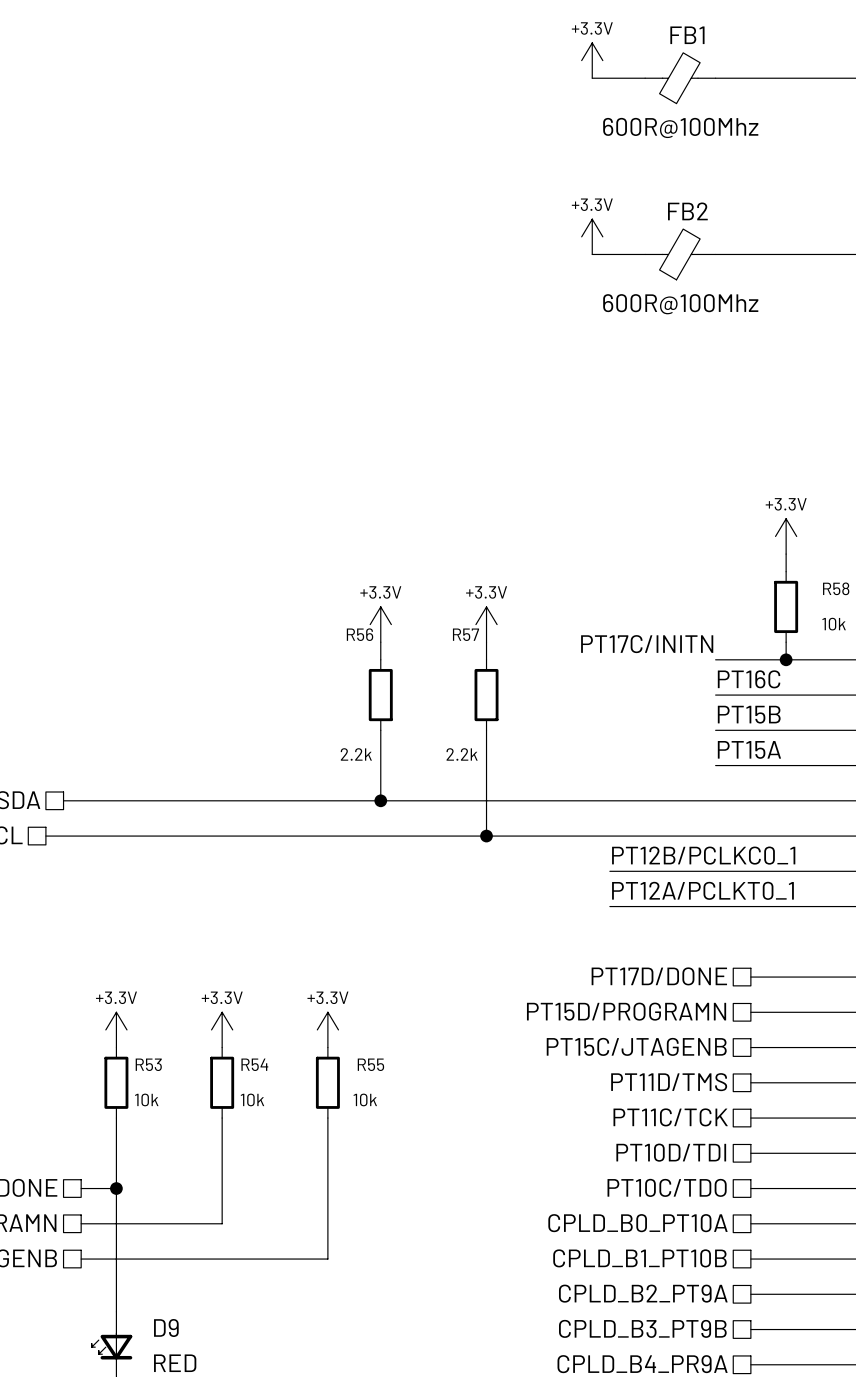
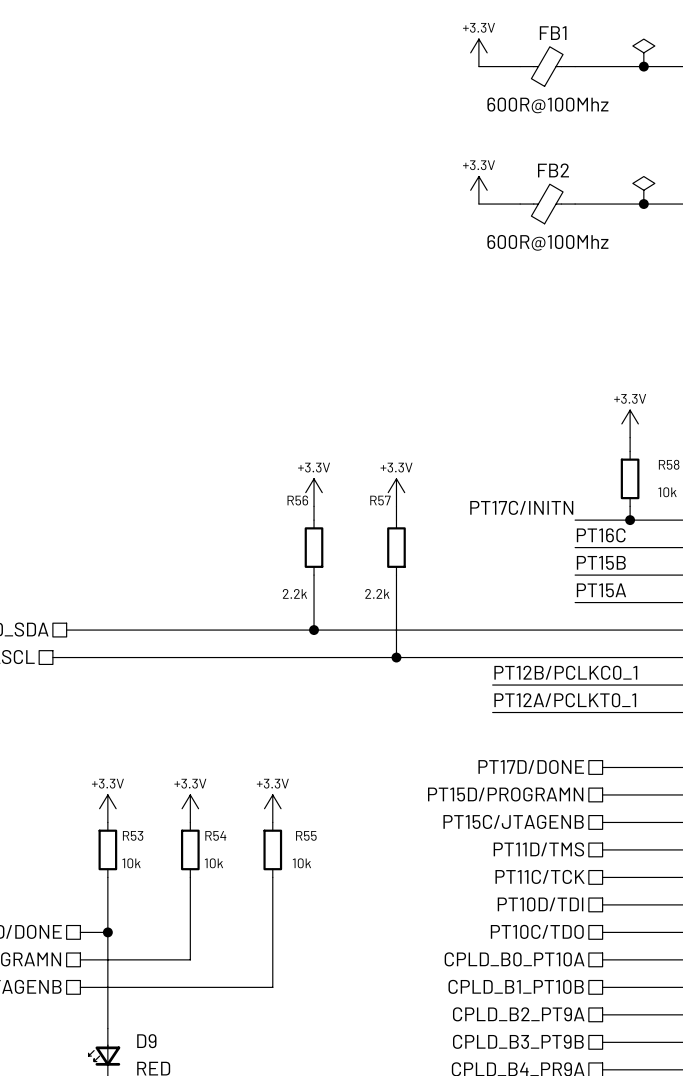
power symbol: none -> (643, 52)
junction: none -> (643, 66)
power symbol: none -> (643, 190)
junction: none -> (643, 204)

